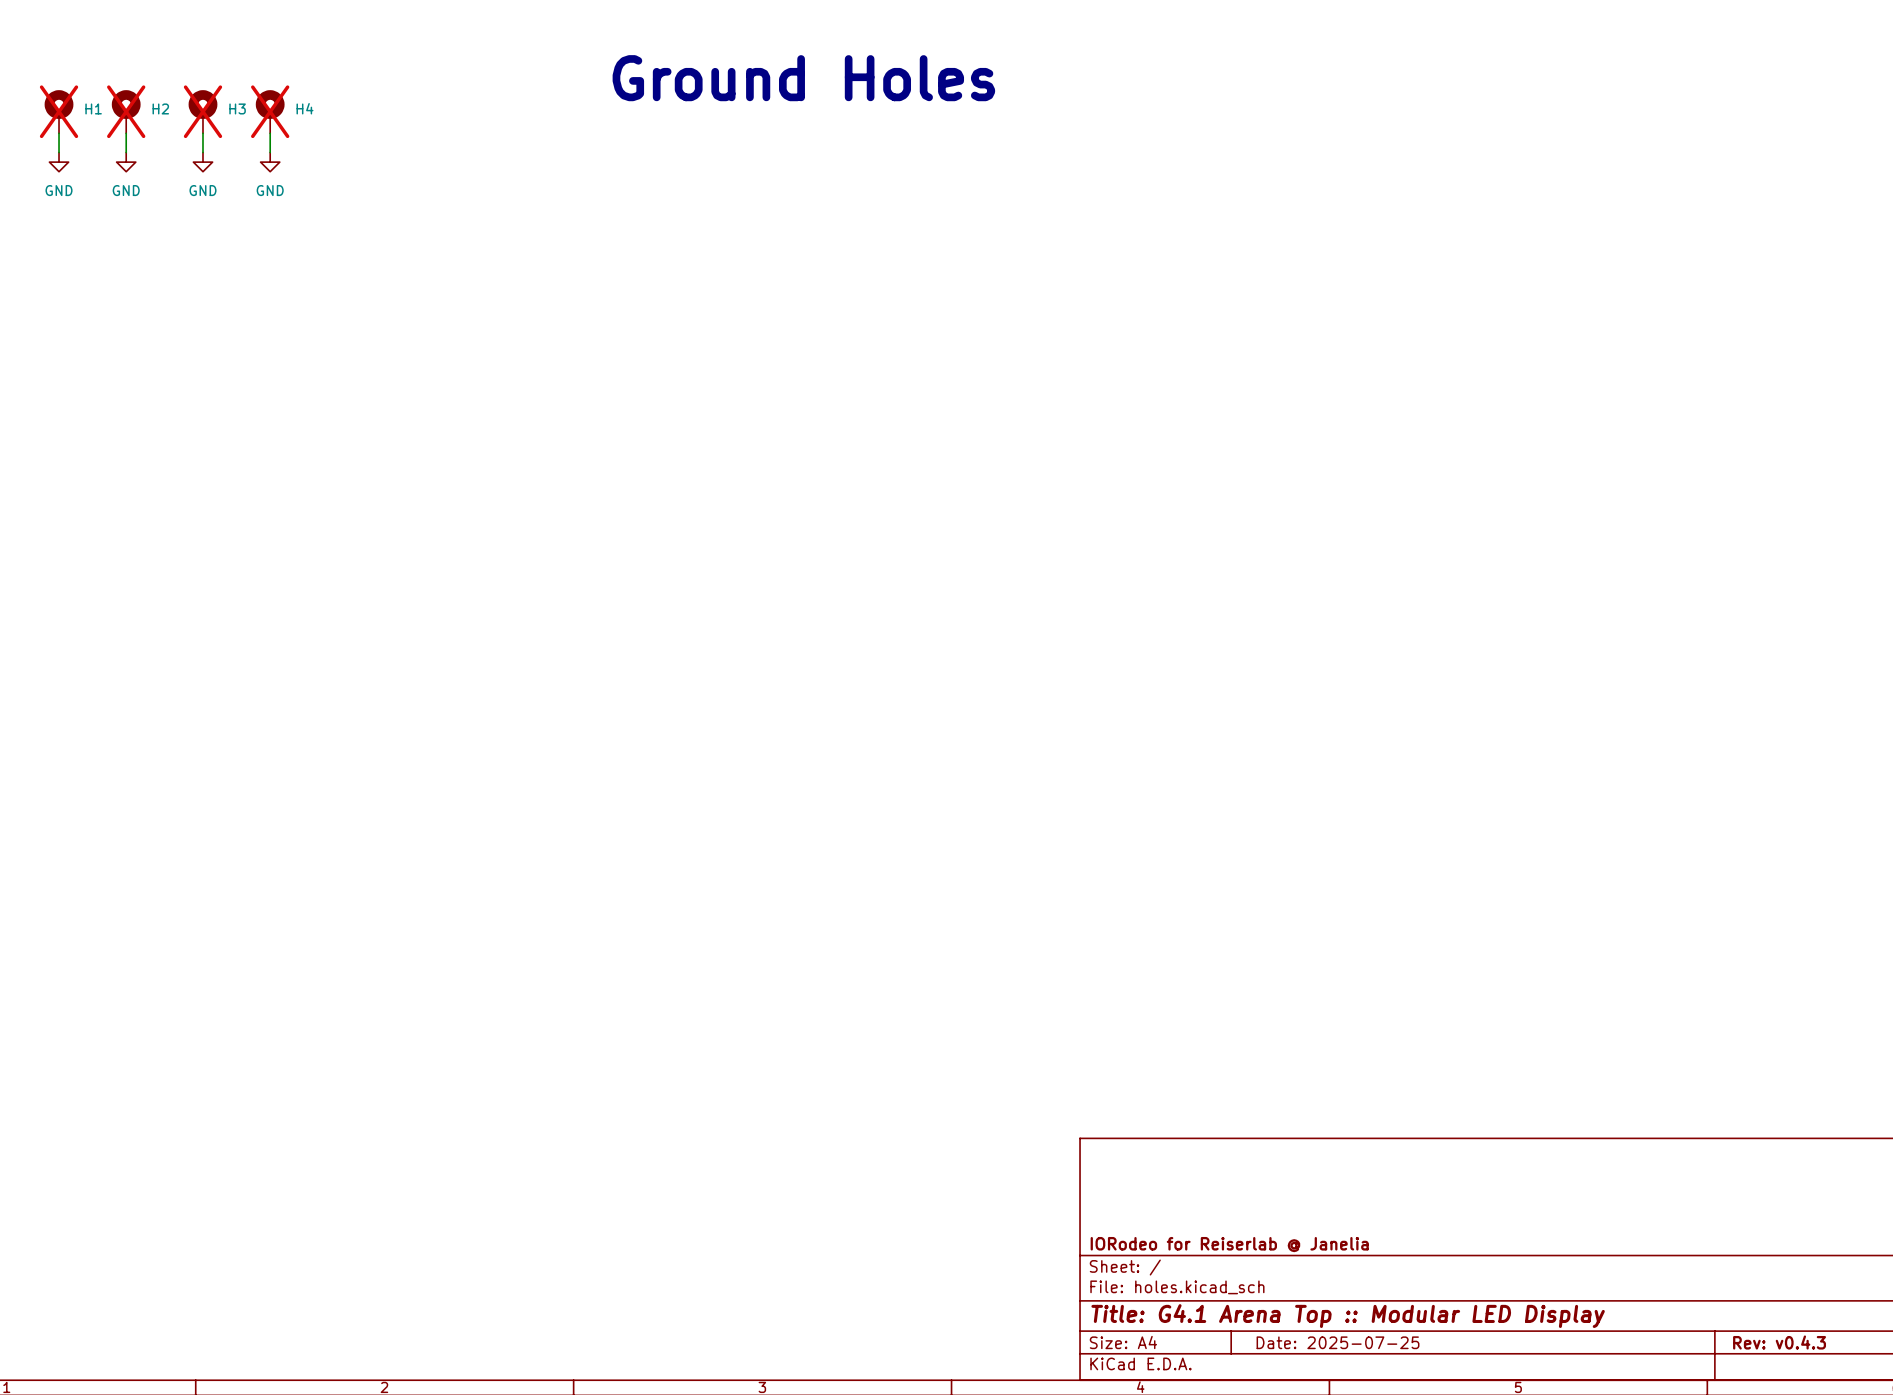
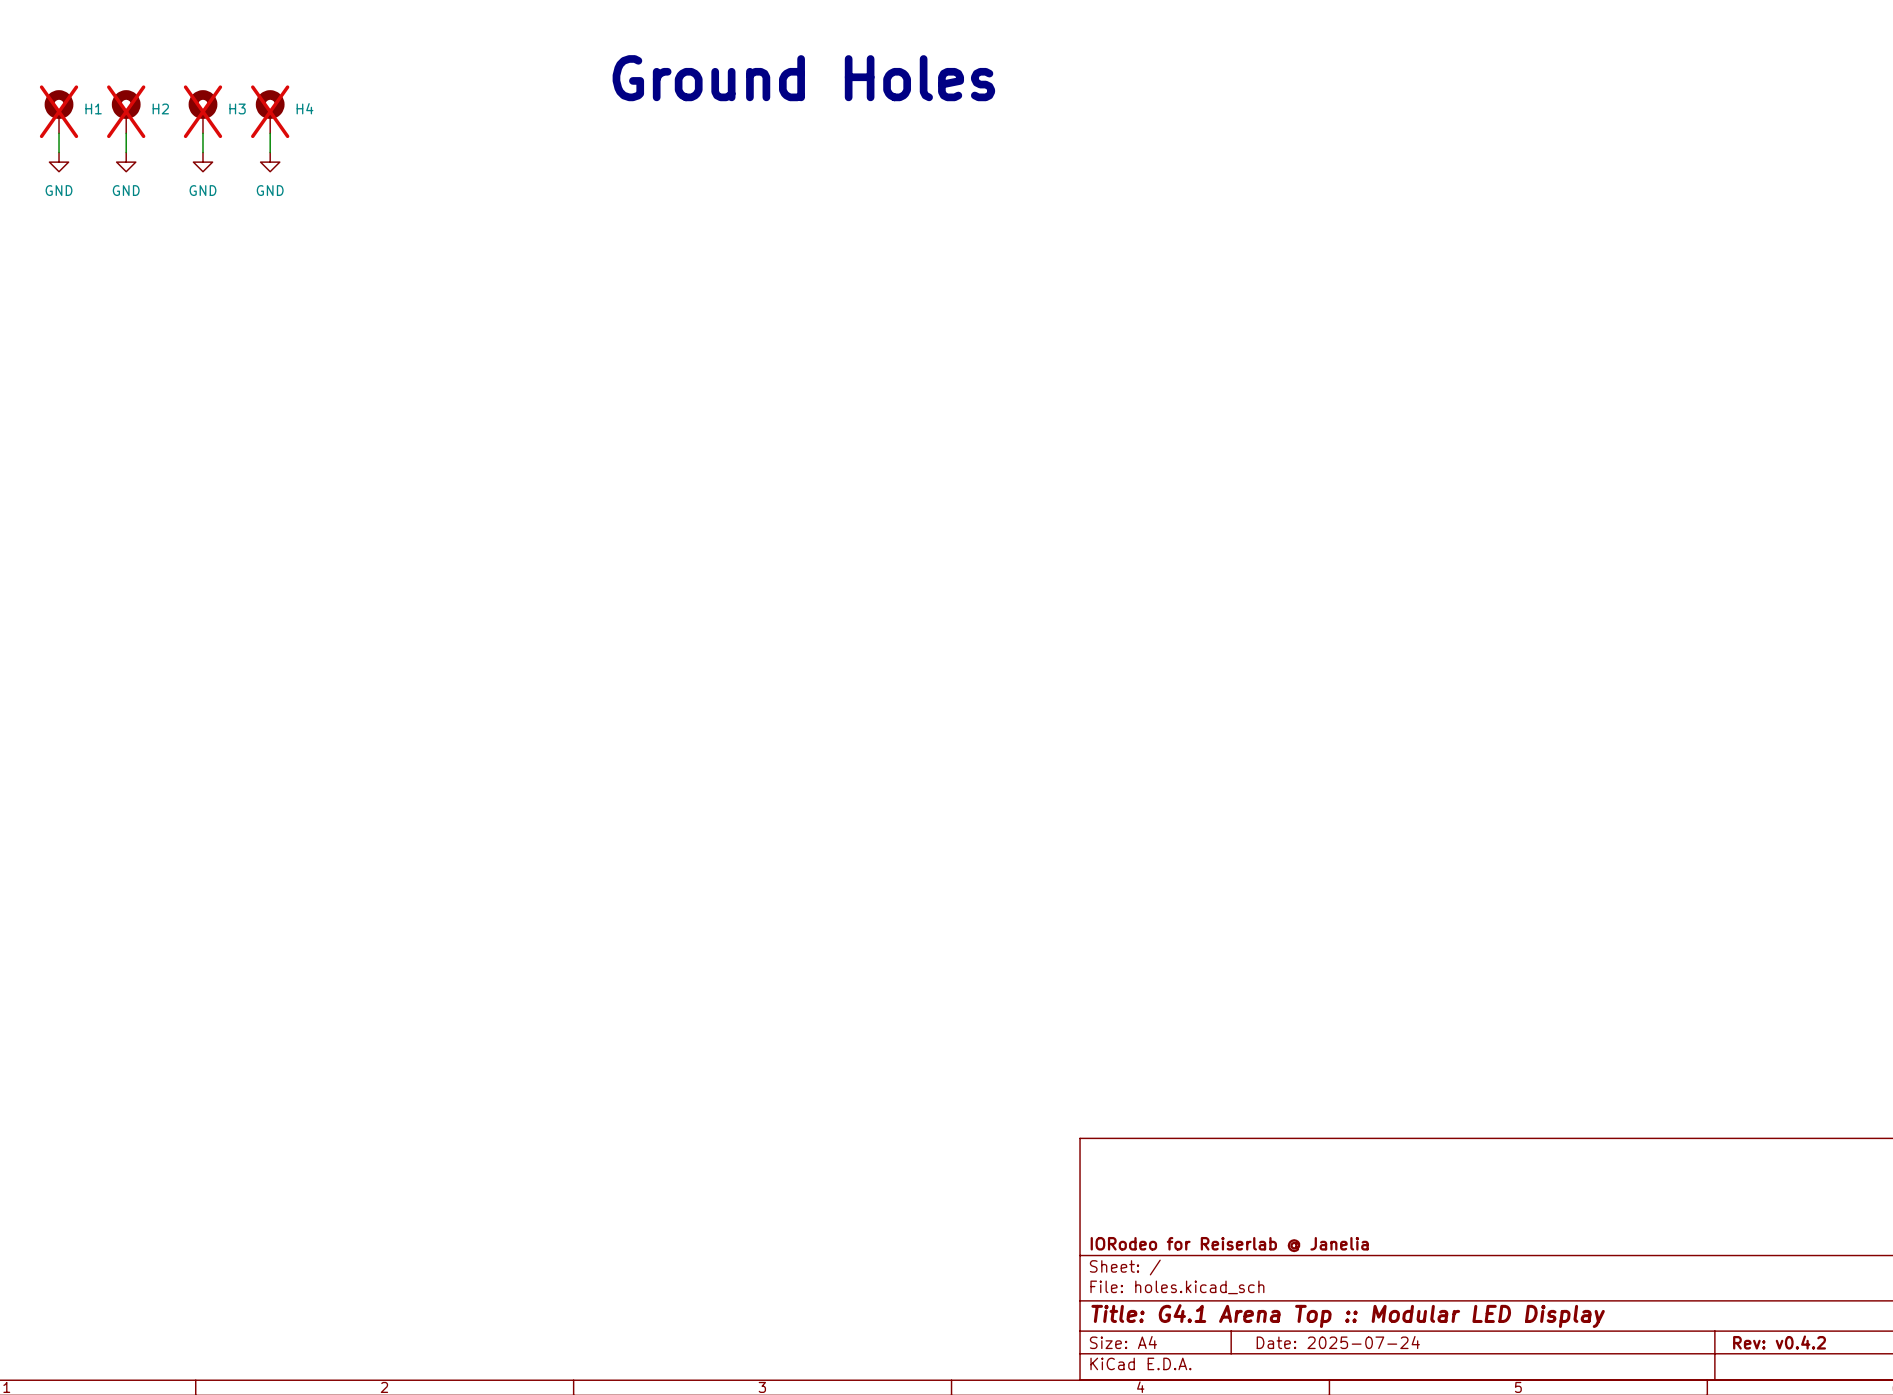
title block: Date: 2025-07-25 (1338, 1342) -> Date: 2025-07-24 (1338, 1342)
title block: Rev: v0.4.3 (1779, 1342) -> Rev: v0.4.2 (1779, 1342)

